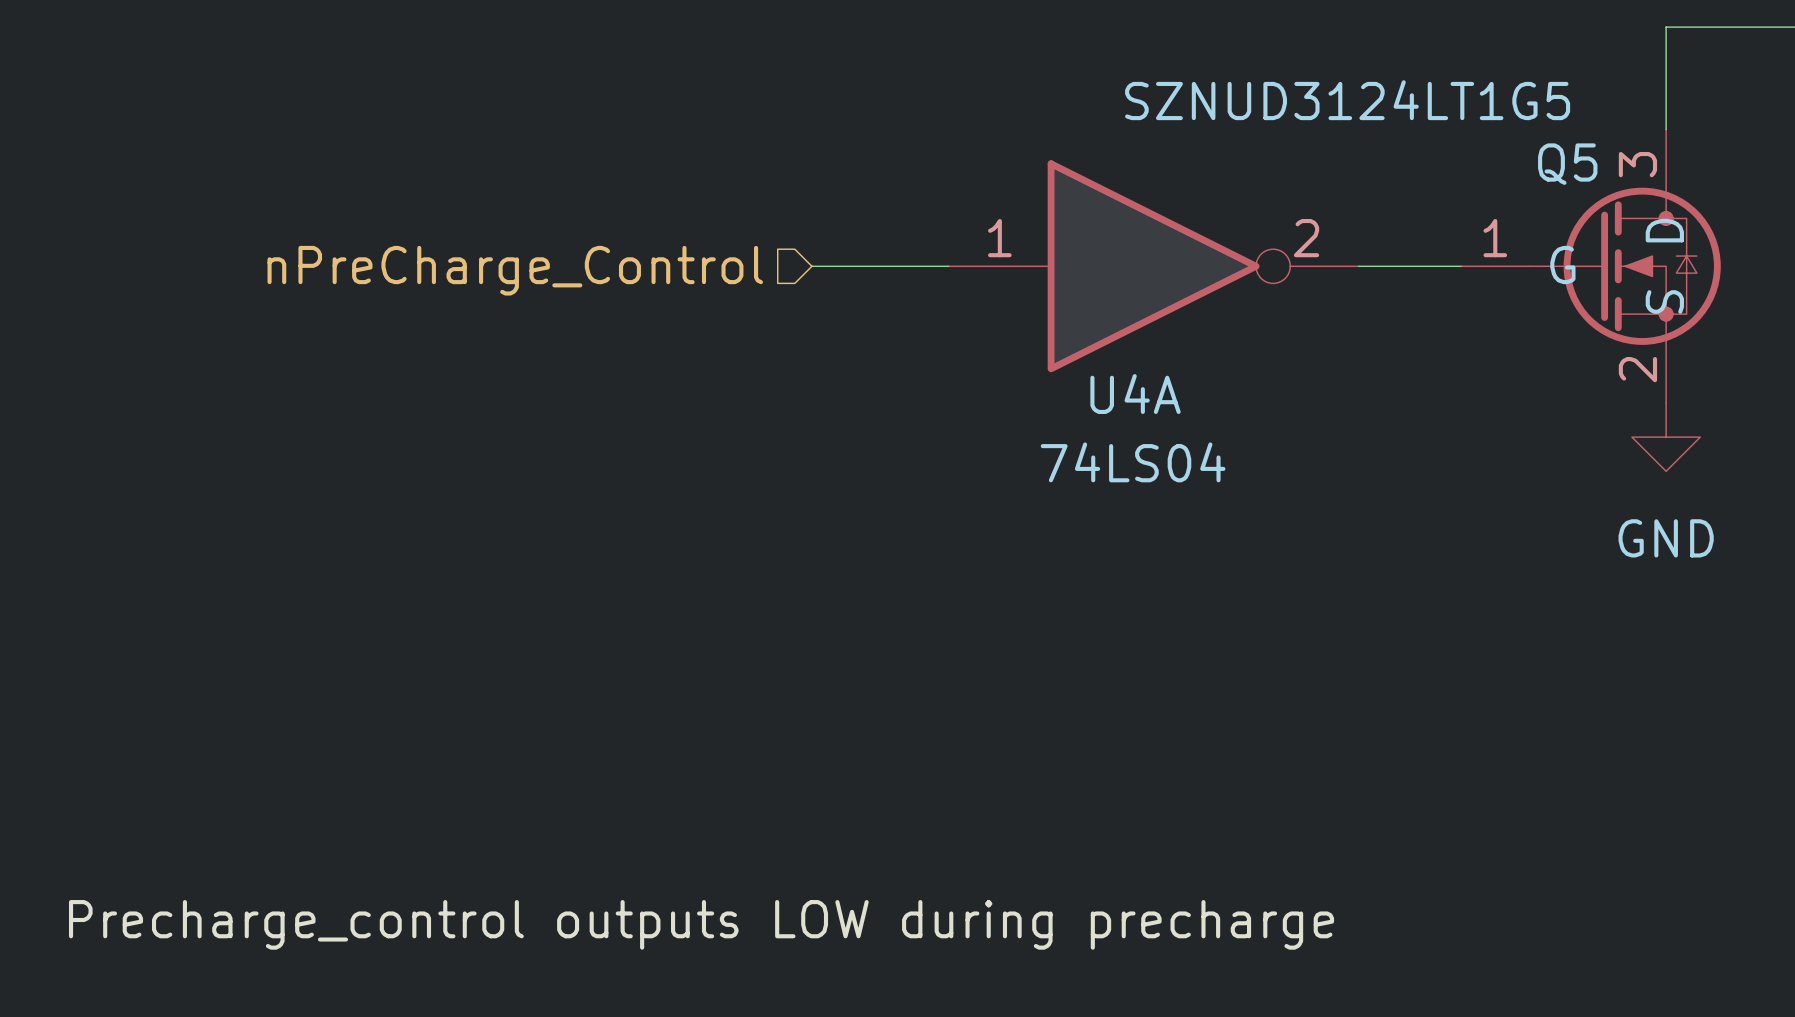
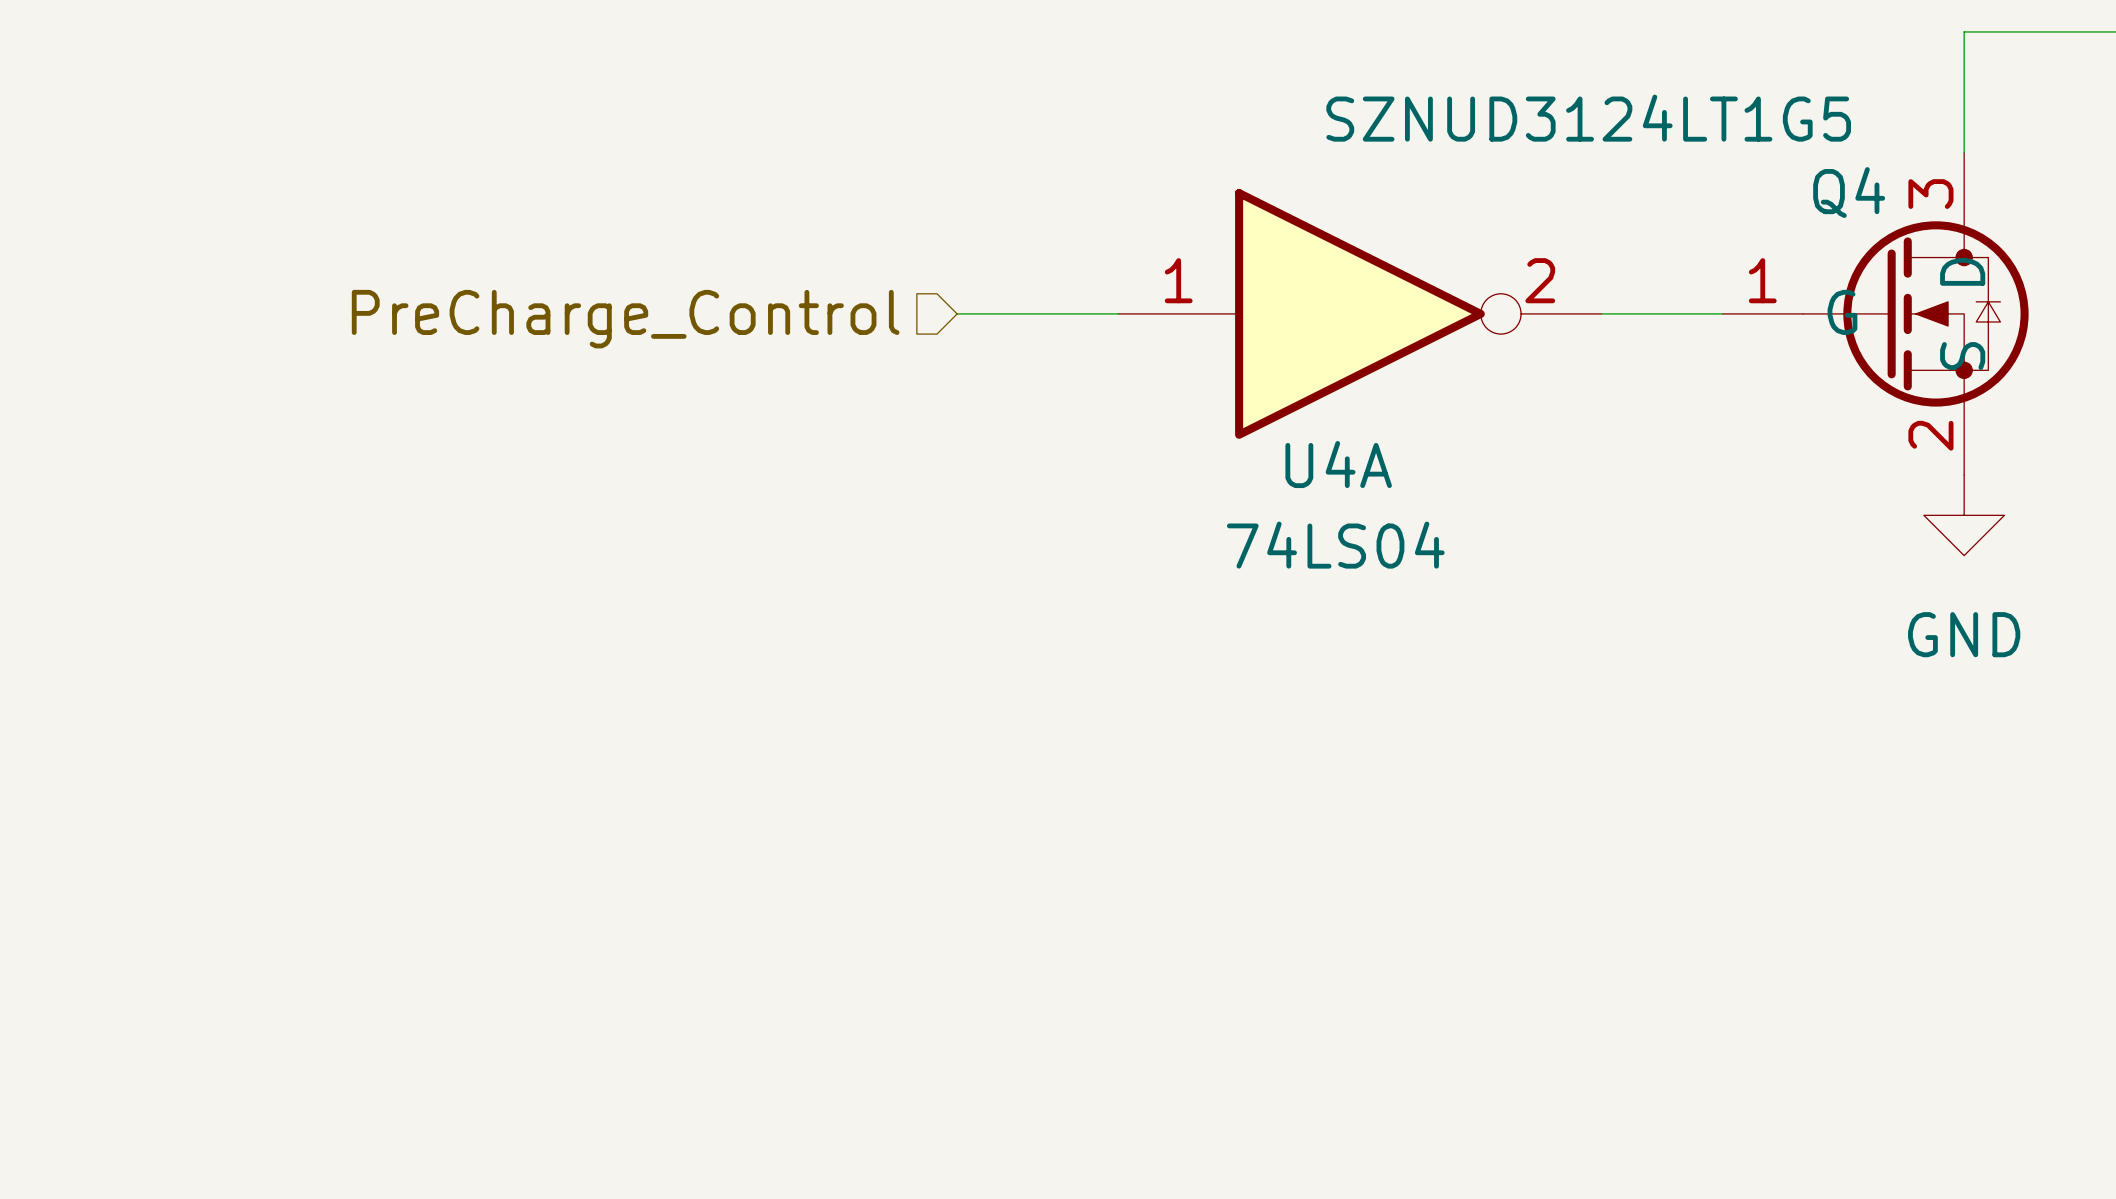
SZNUD3124LT1G5 value: Q5 (1567, 164) -> Q4 (1849, 192)
hierarchical label: nPreCharge_Control (515, 270) -> PreCharge_Control (625, 319)
label: Precharge_control outputs LOW during precharge (701, 924) -> none

